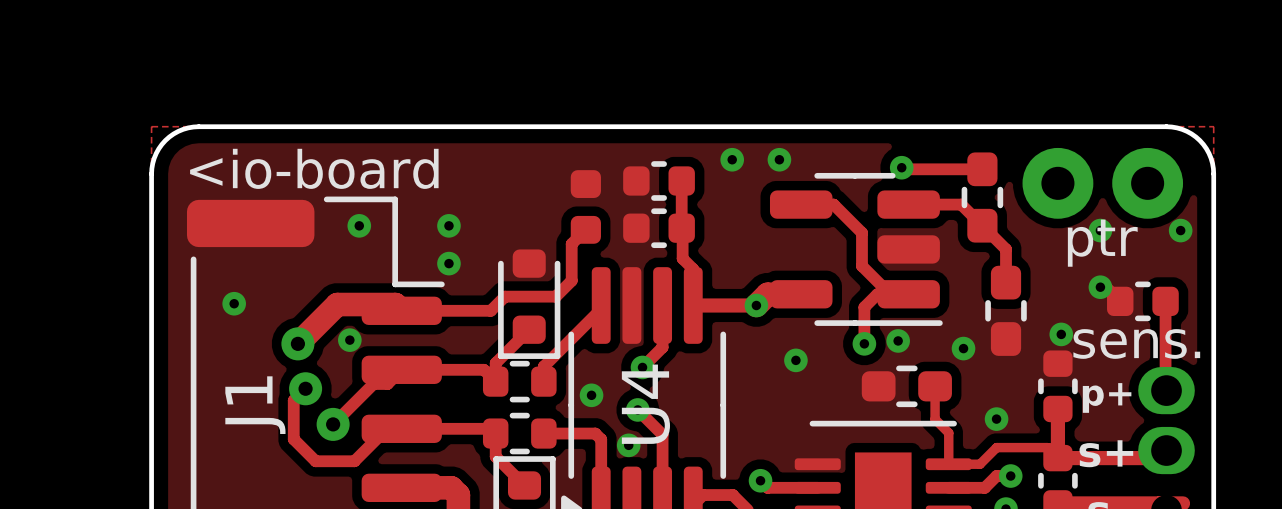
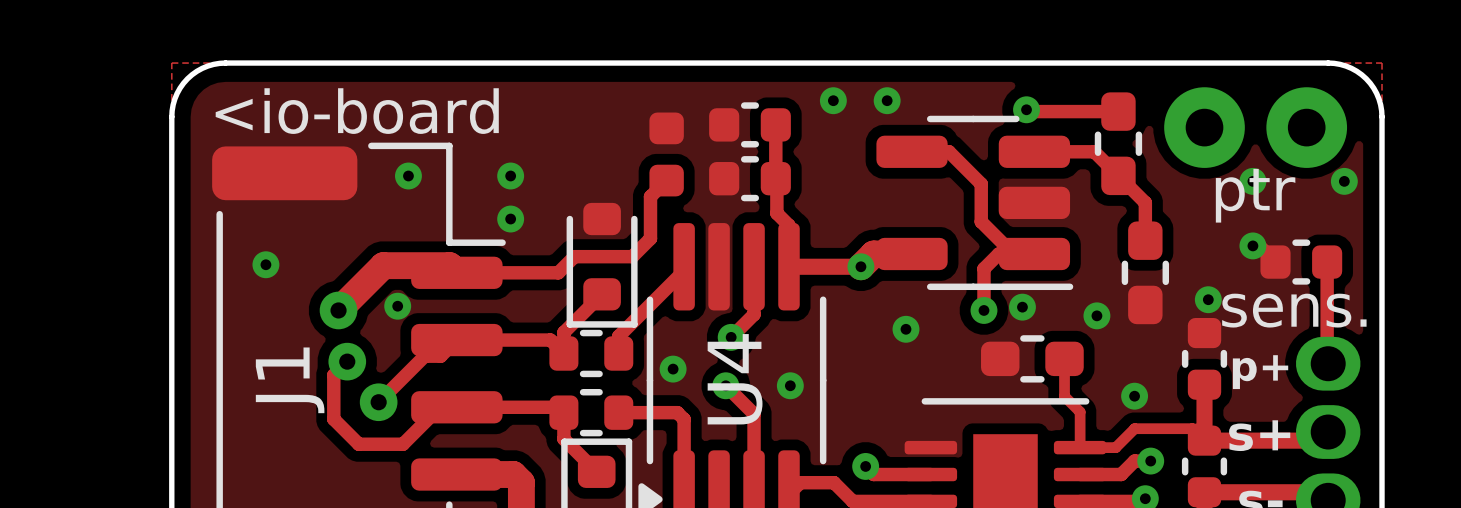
via position: (628, 445) -> (790, 385)

